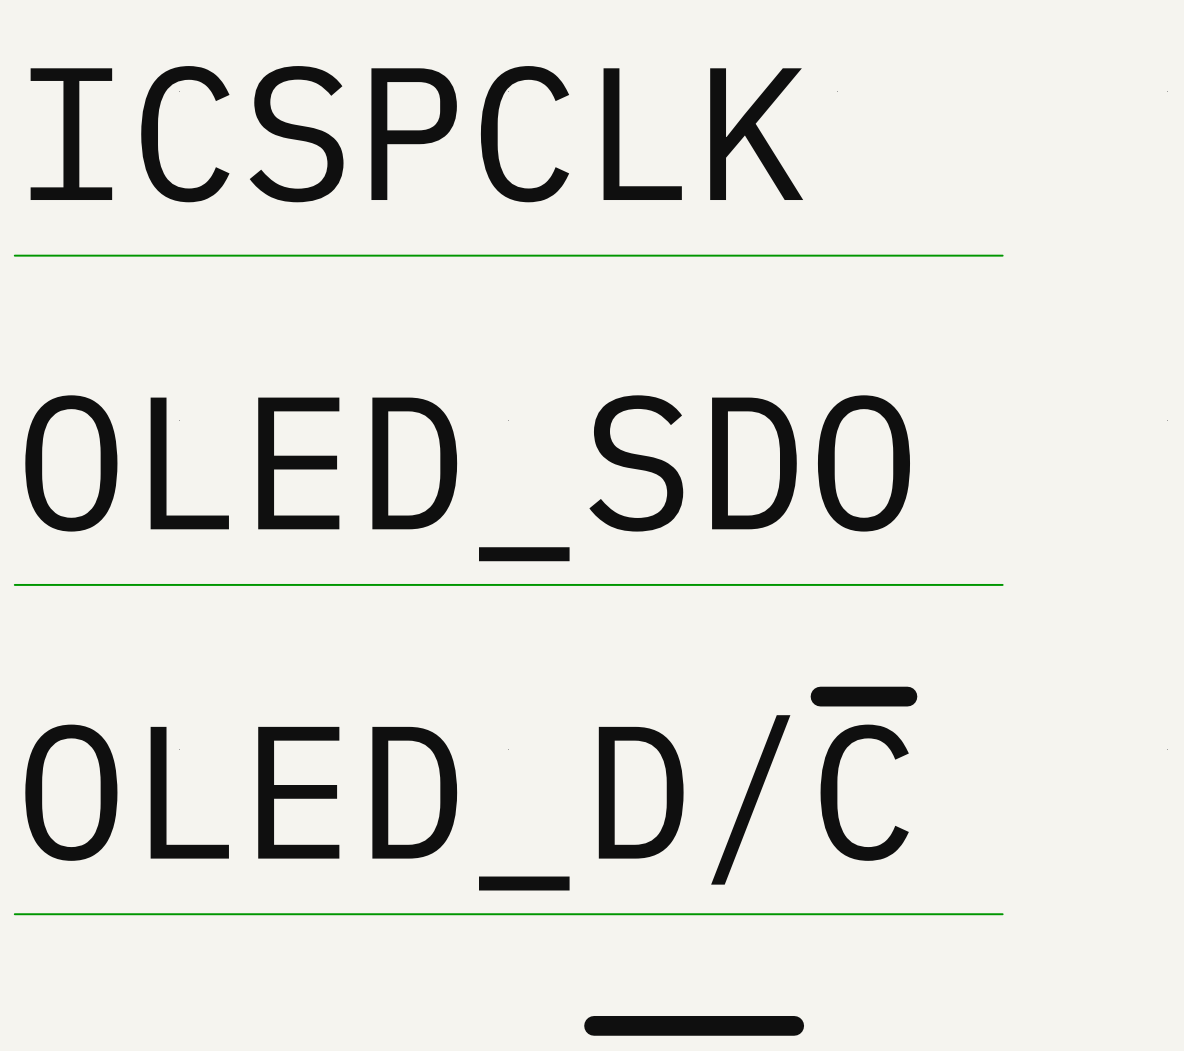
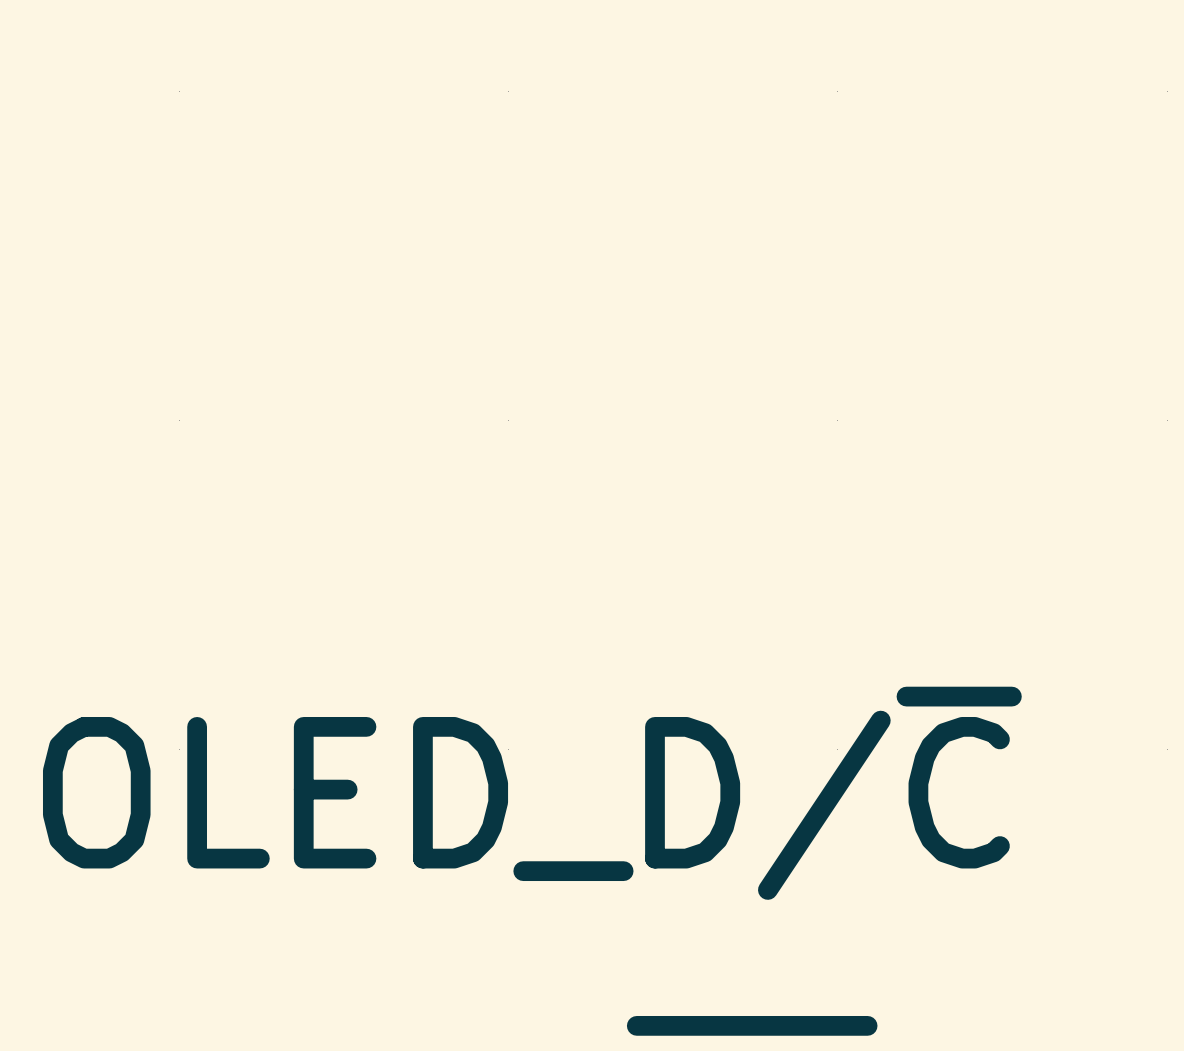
label: ICSPCLK (416, 134) -> none
wire: (14, 255) (1002, 255) -> none
label: OLED_SDO (467, 478) -> none
wire: (14, 584) (1002, 584) -> none
wire: (14, 914) (1002, 914) -> none

